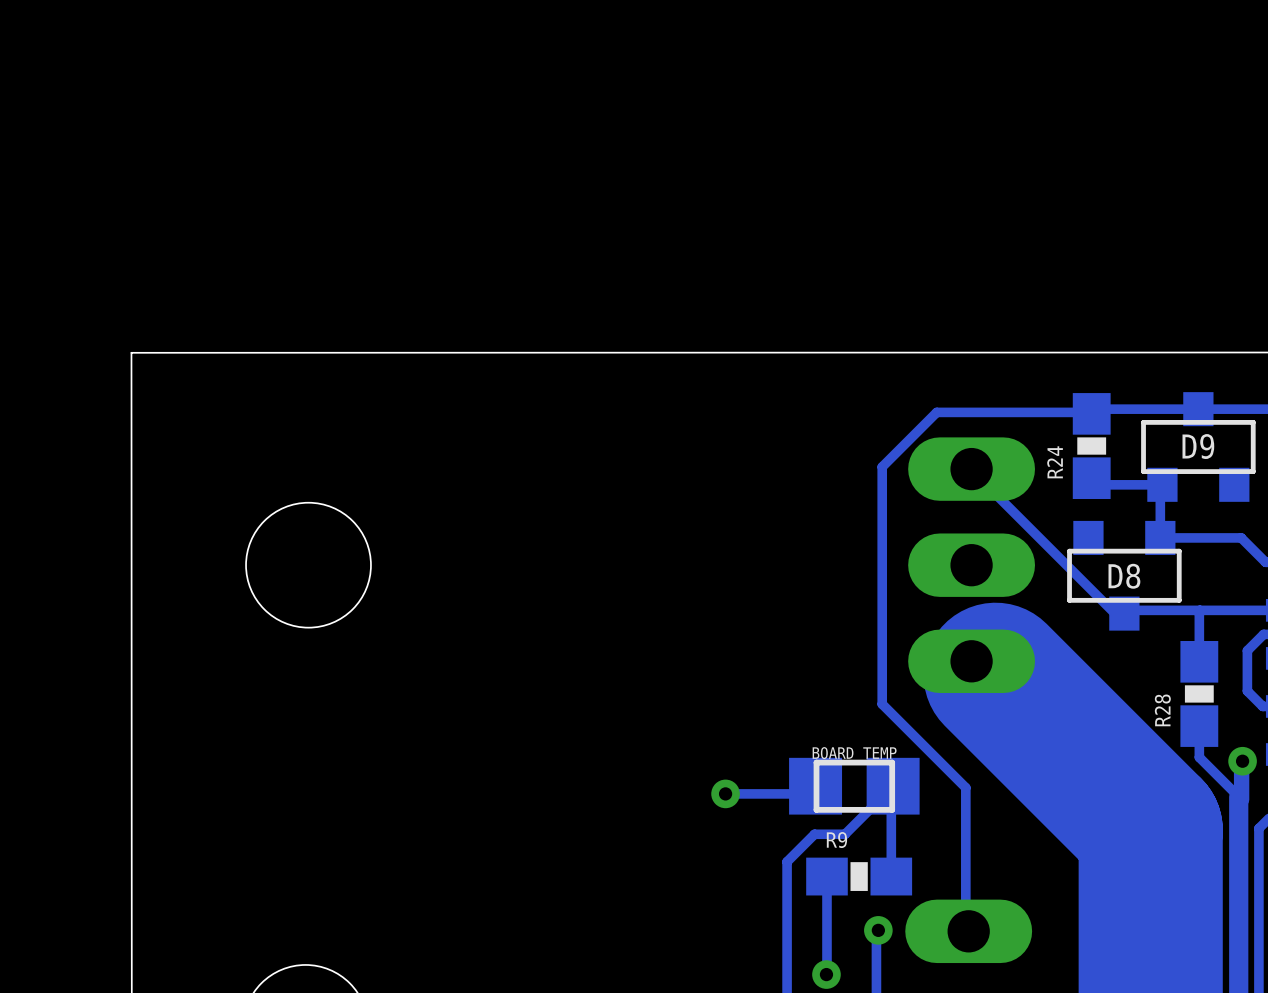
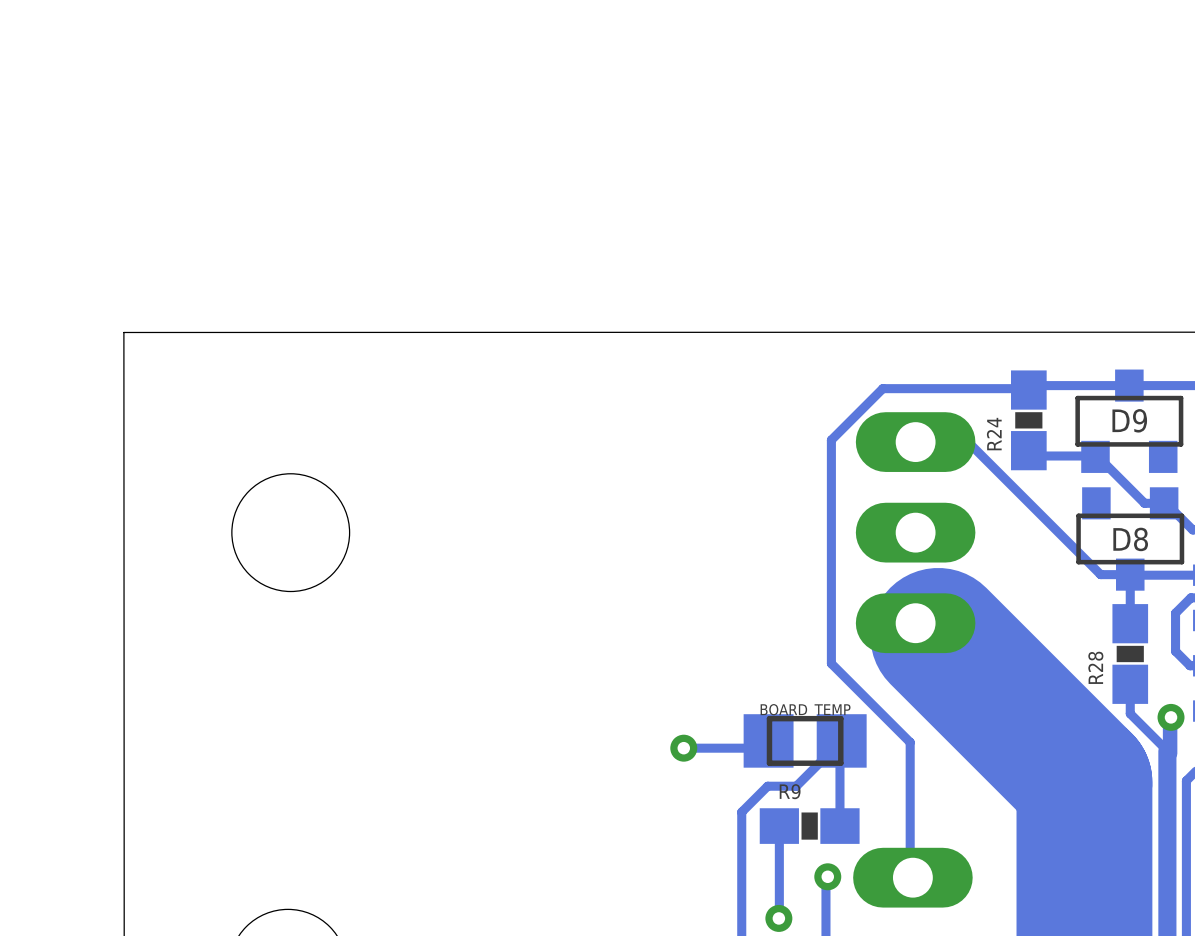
track: (971, 469) (1115, 613) (1124, 613) (1121, 610) (1199, 610) -> (915, 442) (968, 442) (1100, 574) (1130, 575)
track: (1097, 483) (1162, 484) (1160, 486) (1160, 537) (1241, 537) -> (1034, 455) (1097, 455) (1144, 503) (1166, 503) (1169, 506)
D8 position: (1124, 575) -> (1130, 538)

